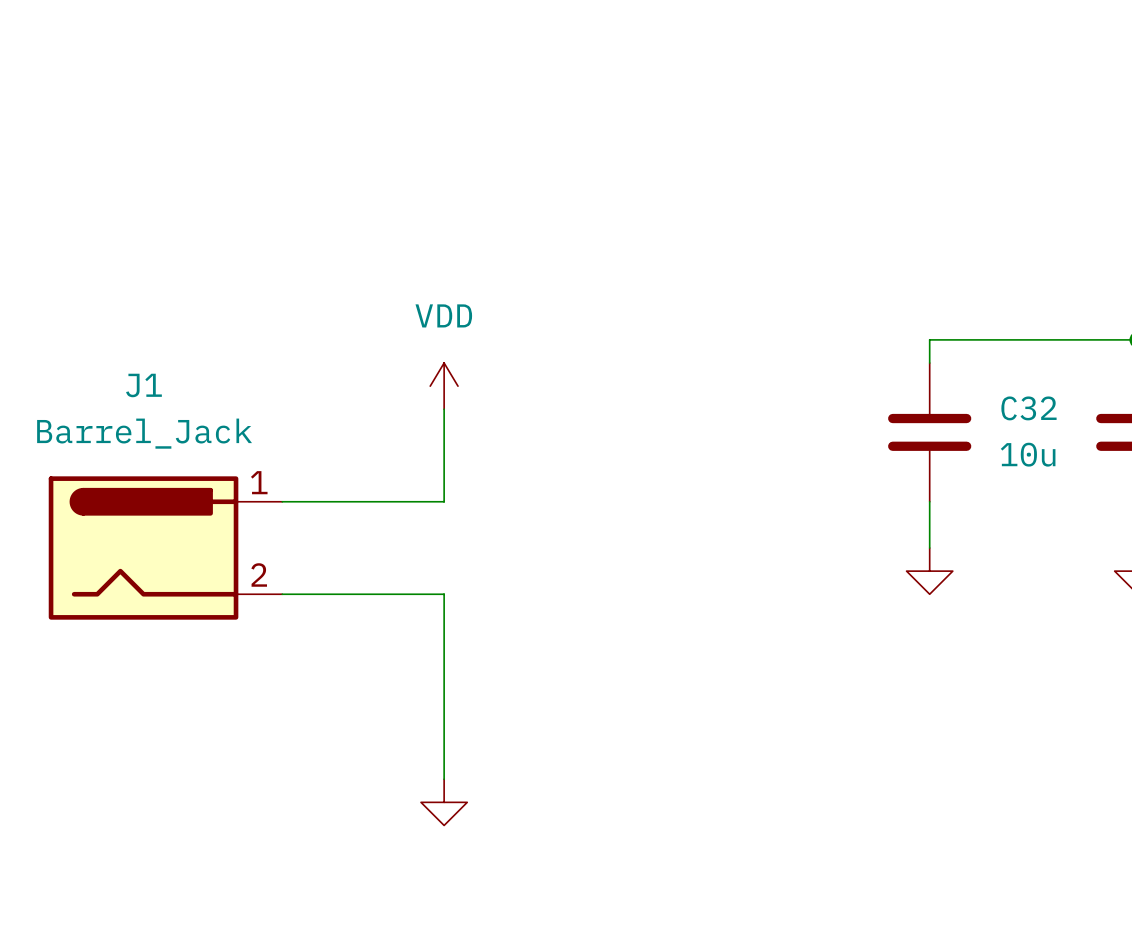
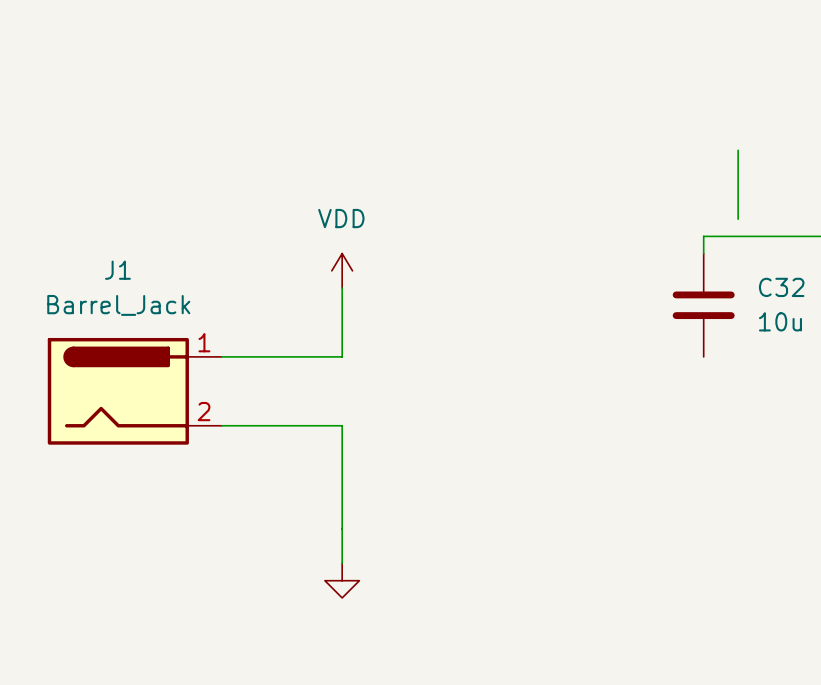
wire: none -> (738, 150) (738, 219)
wire: (929, 501) (929, 548) -> none
power symbol: (929, 571) -> none

